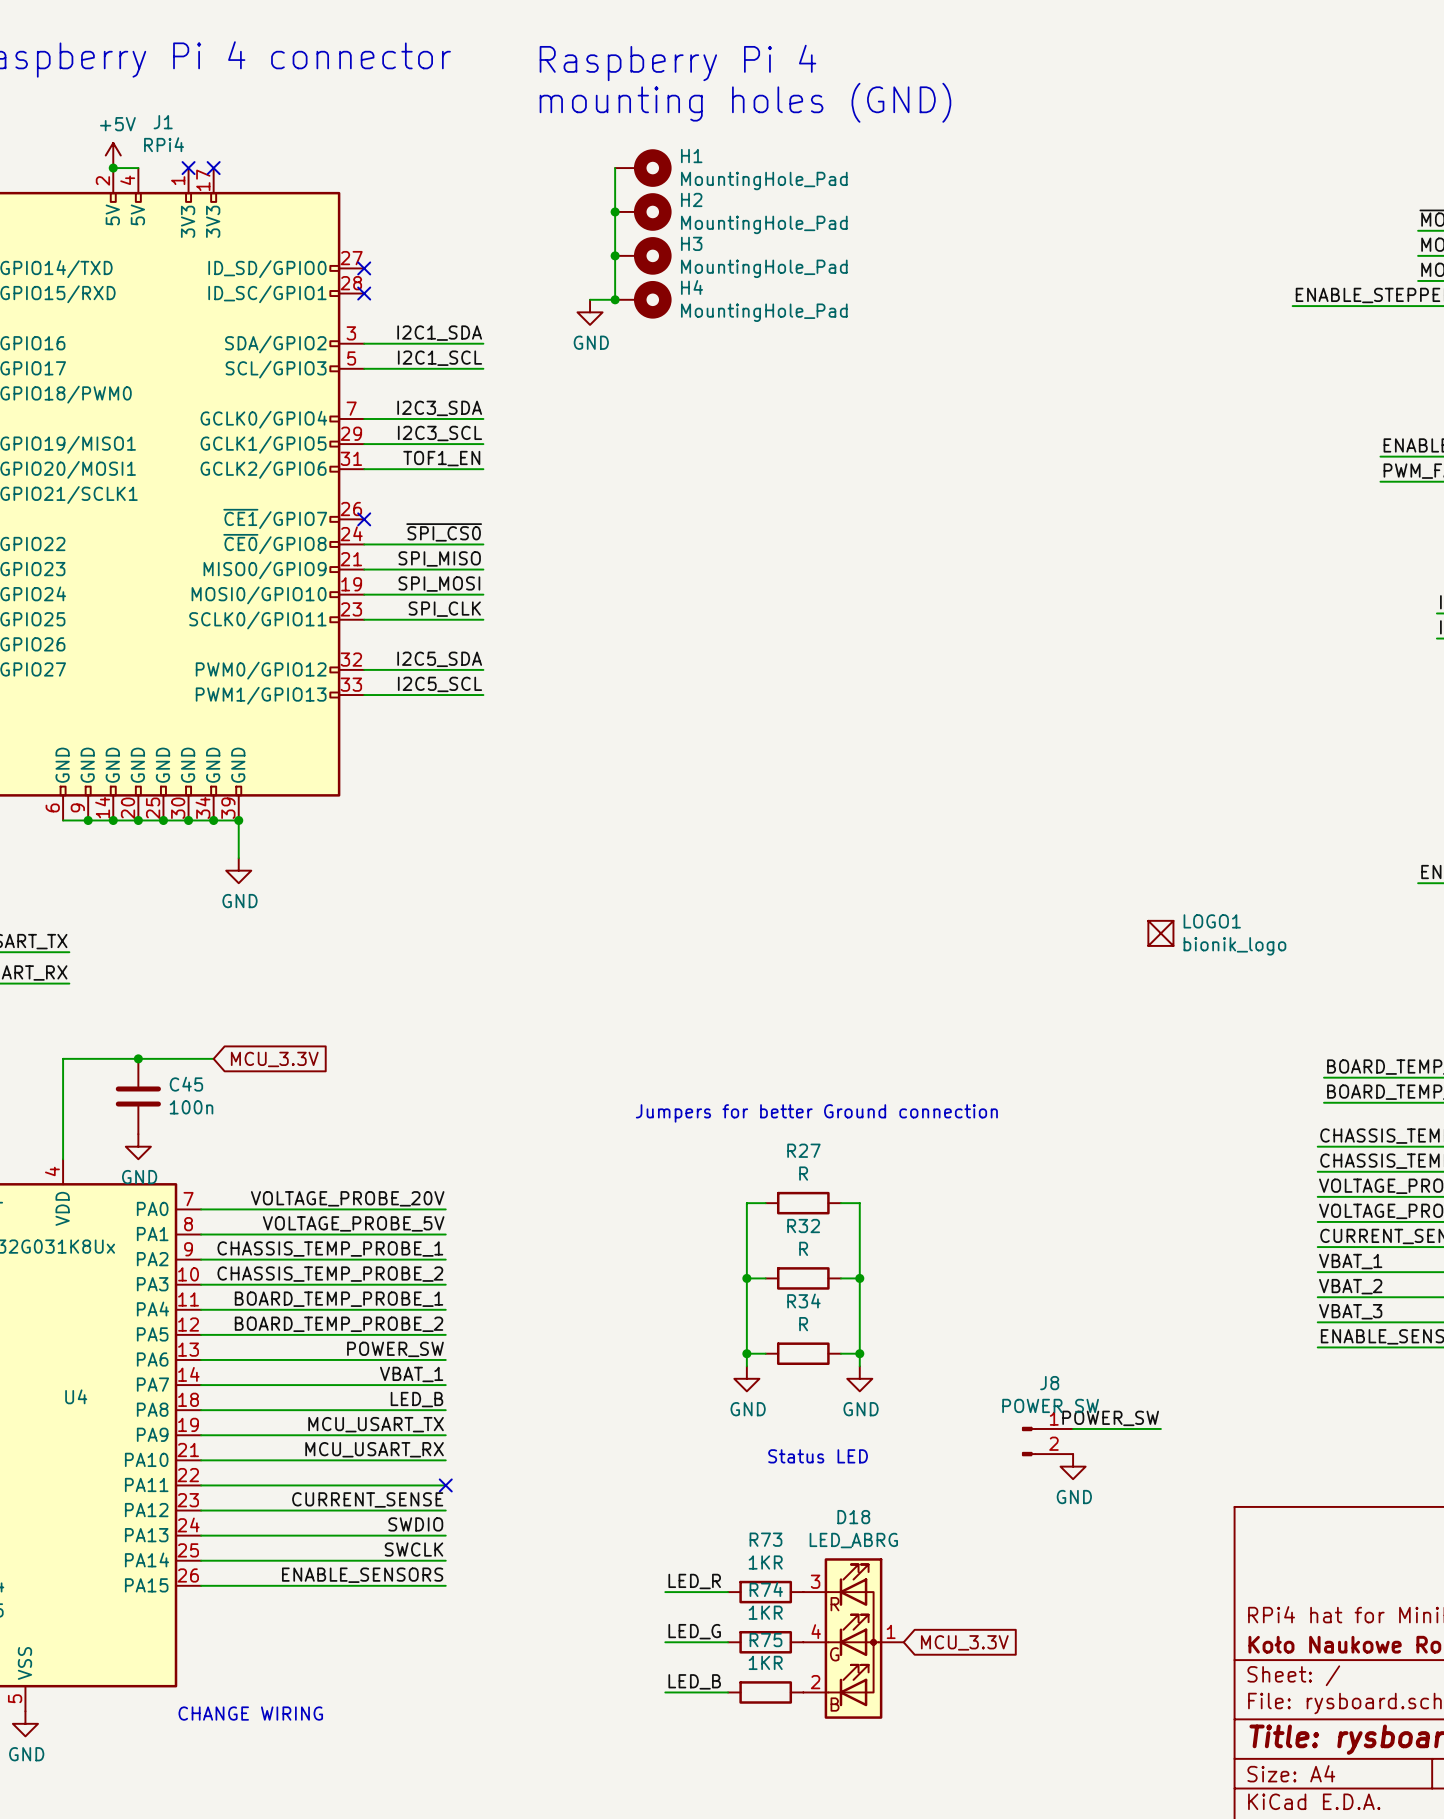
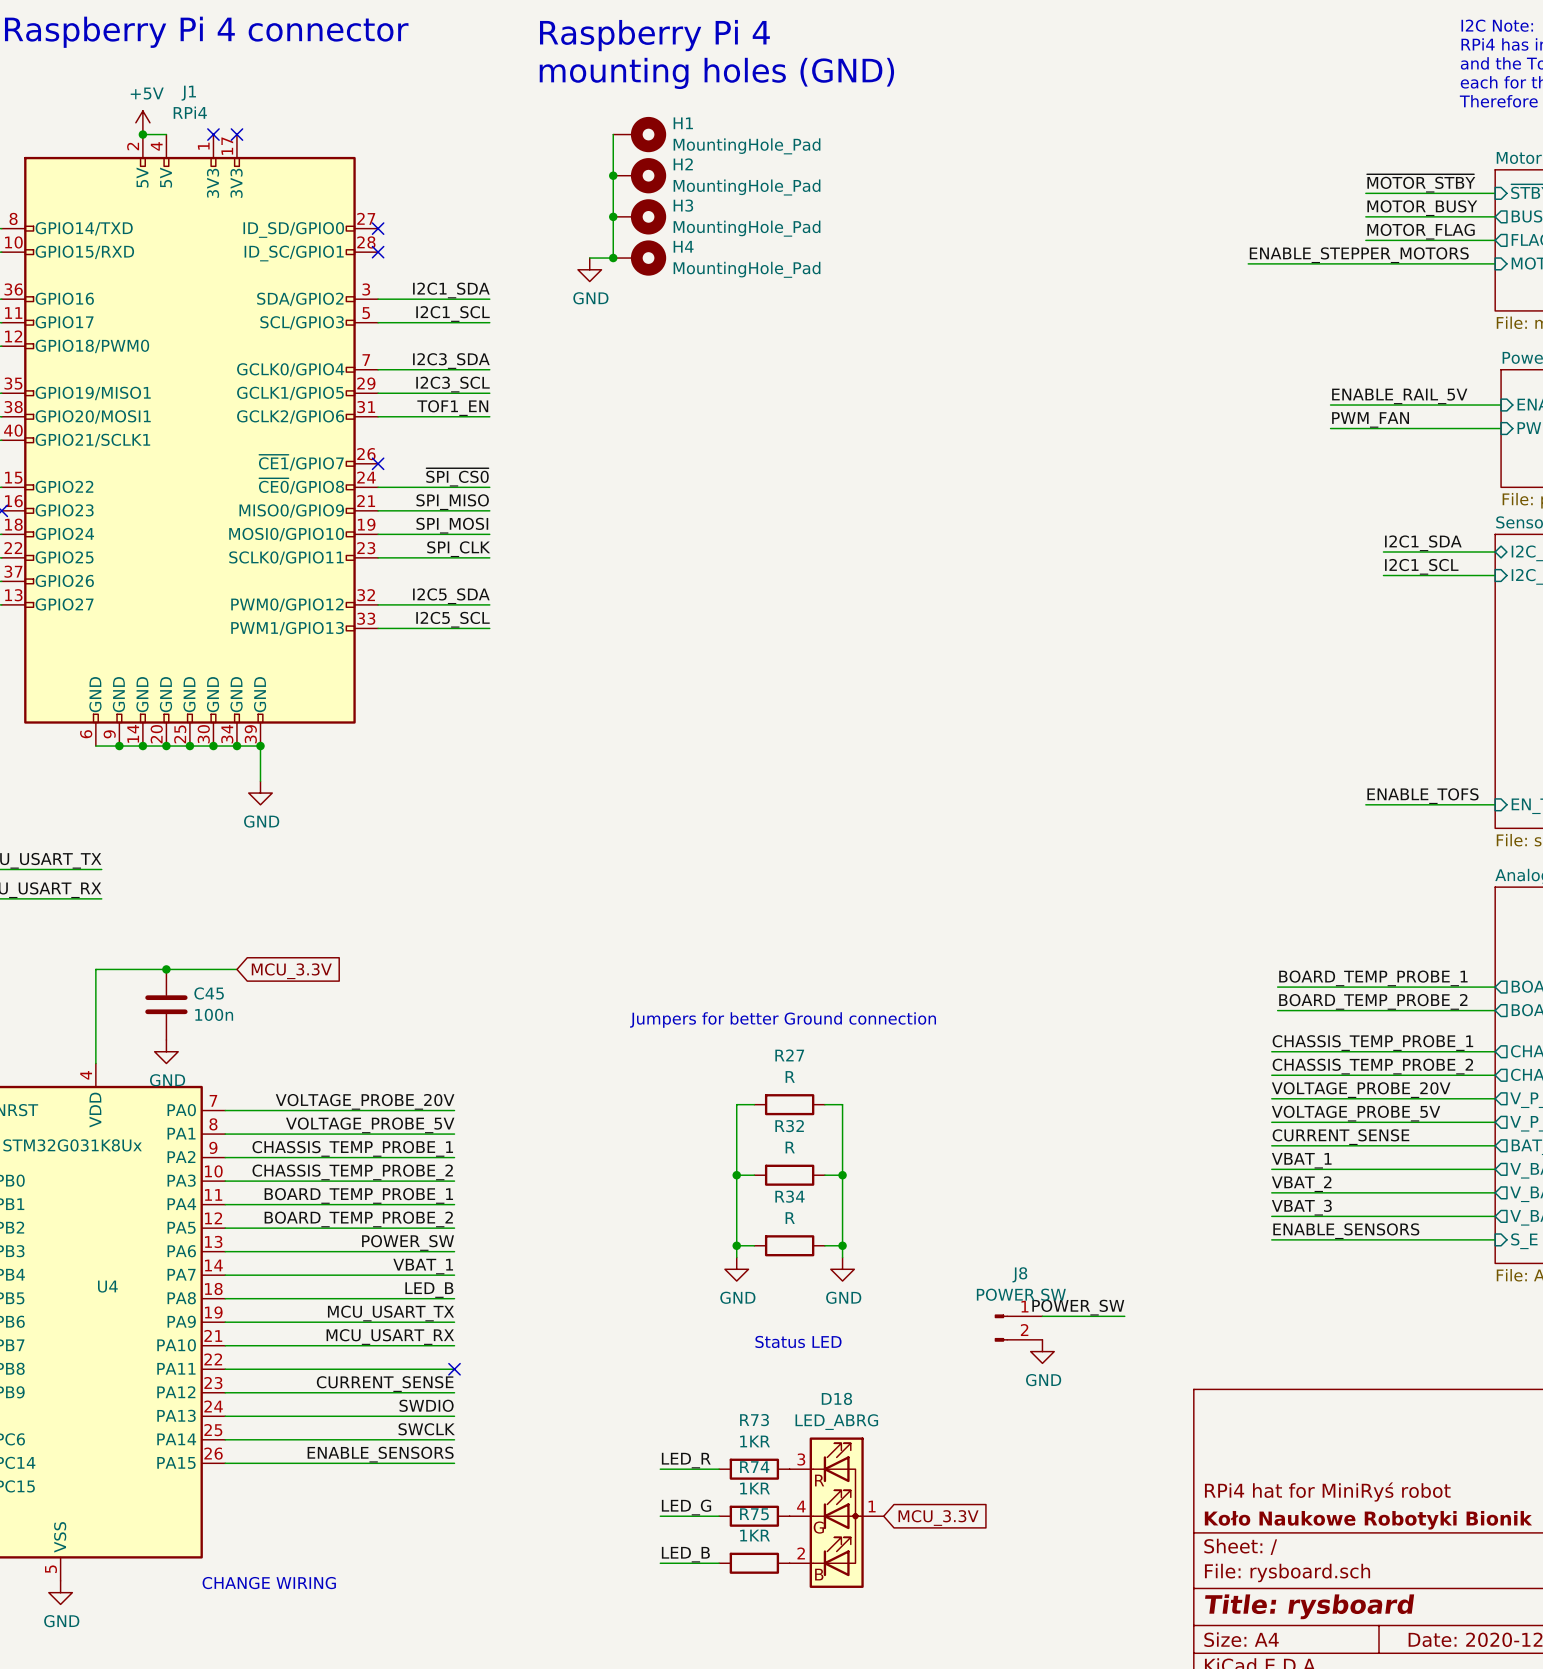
LOGO1: bionik_logo (1160, 933) -> none

